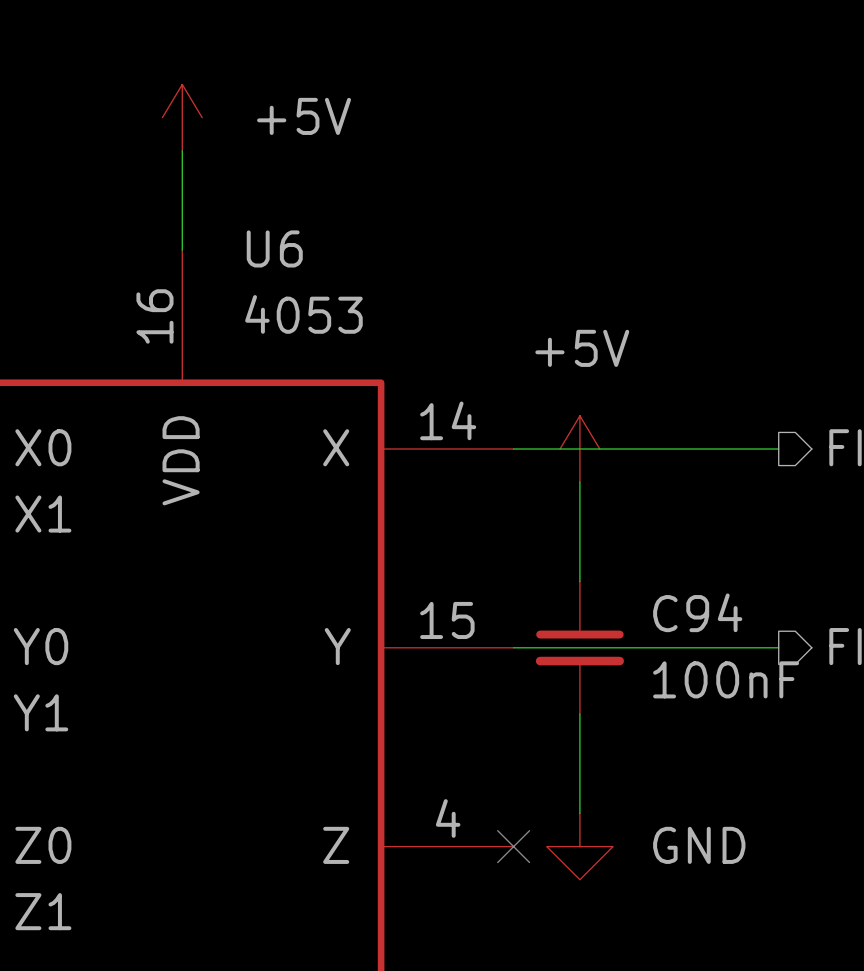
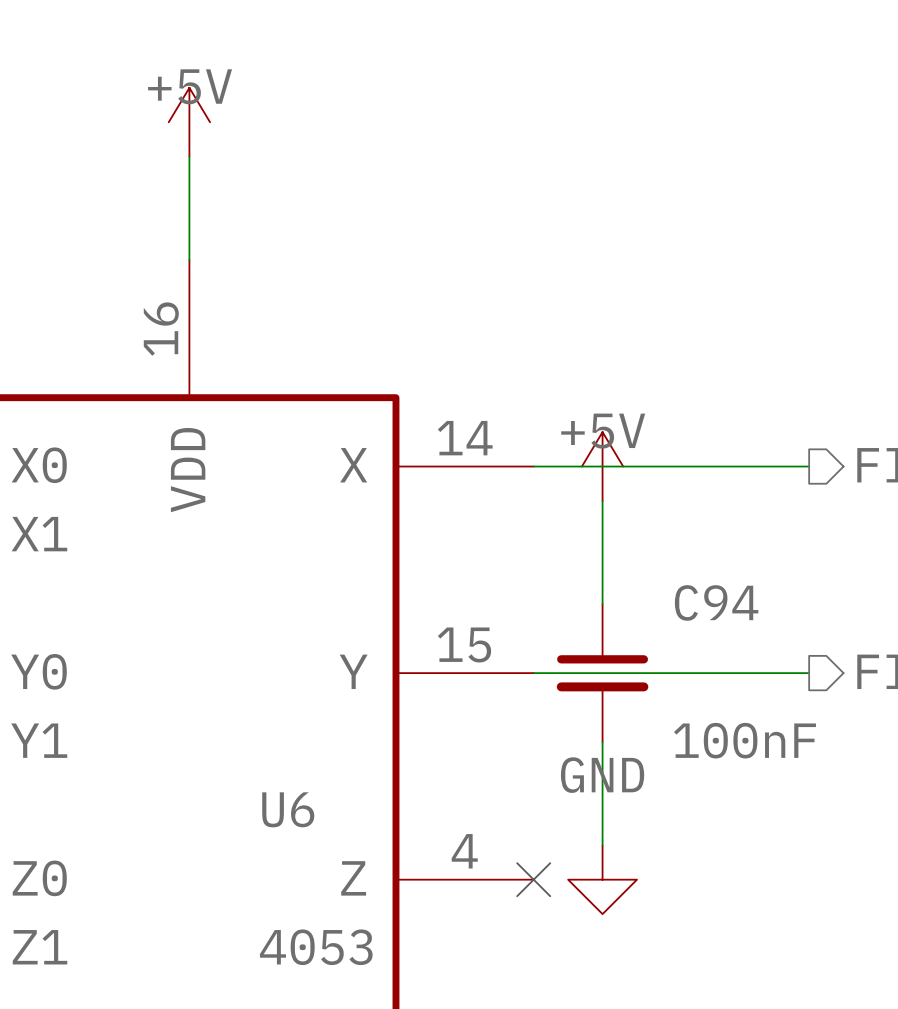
power symbol text position: +5V (304, 116) -> +5V (190, 86)
U6 name position: U6 (274, 248) -> U6 (288, 809)
U6 value position: 4053 (303, 314) -> 4053 (316, 947)
power symbol text position: +5V (582, 348) -> +5V (603, 431)
C94 name position: C94 (697, 612) -> C94 (716, 602)
C94 value position: 100nF (726, 679) -> 100nF (744, 740)
power symbol text position: GND (699, 845) -> GND (602, 775)

